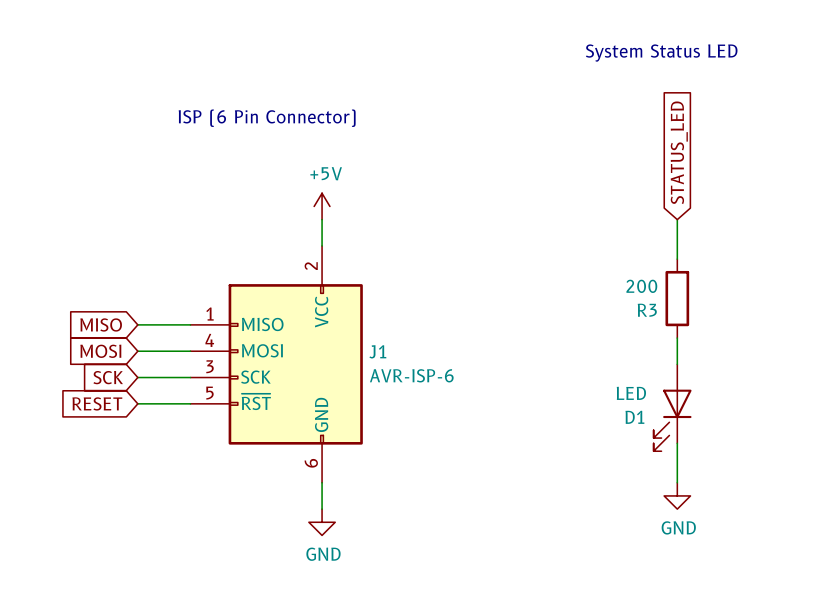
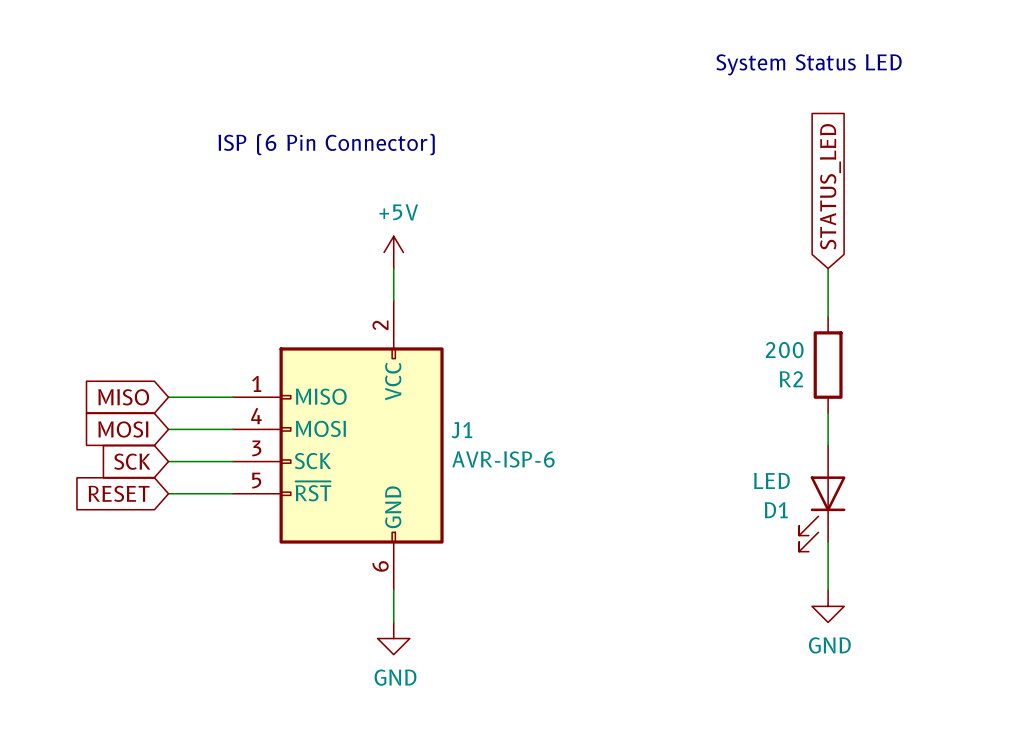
R3 name: R3 (647, 310) -> R2 (791, 379)

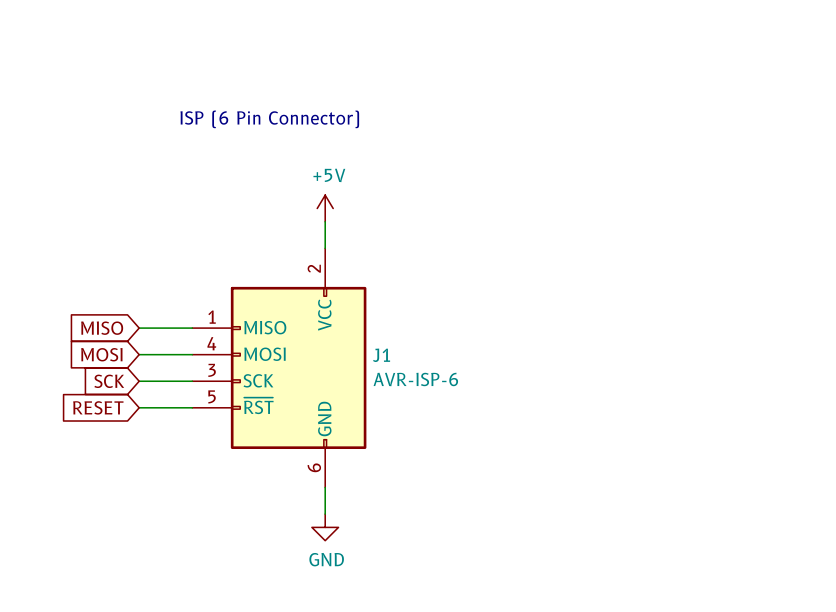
text: System Status LED (809, 64) -> none
global label: STATUS_LED (830, 186) -> none
wire: (828, 268) (828, 316) -> none
R2: 200 (828, 365) -> none
wire: (828, 413) (828, 445) -> none
D1: LED (822, 498) -> none
wire: (828, 542) (828, 590) -> none
power symbol: GND (828, 606) -> none

